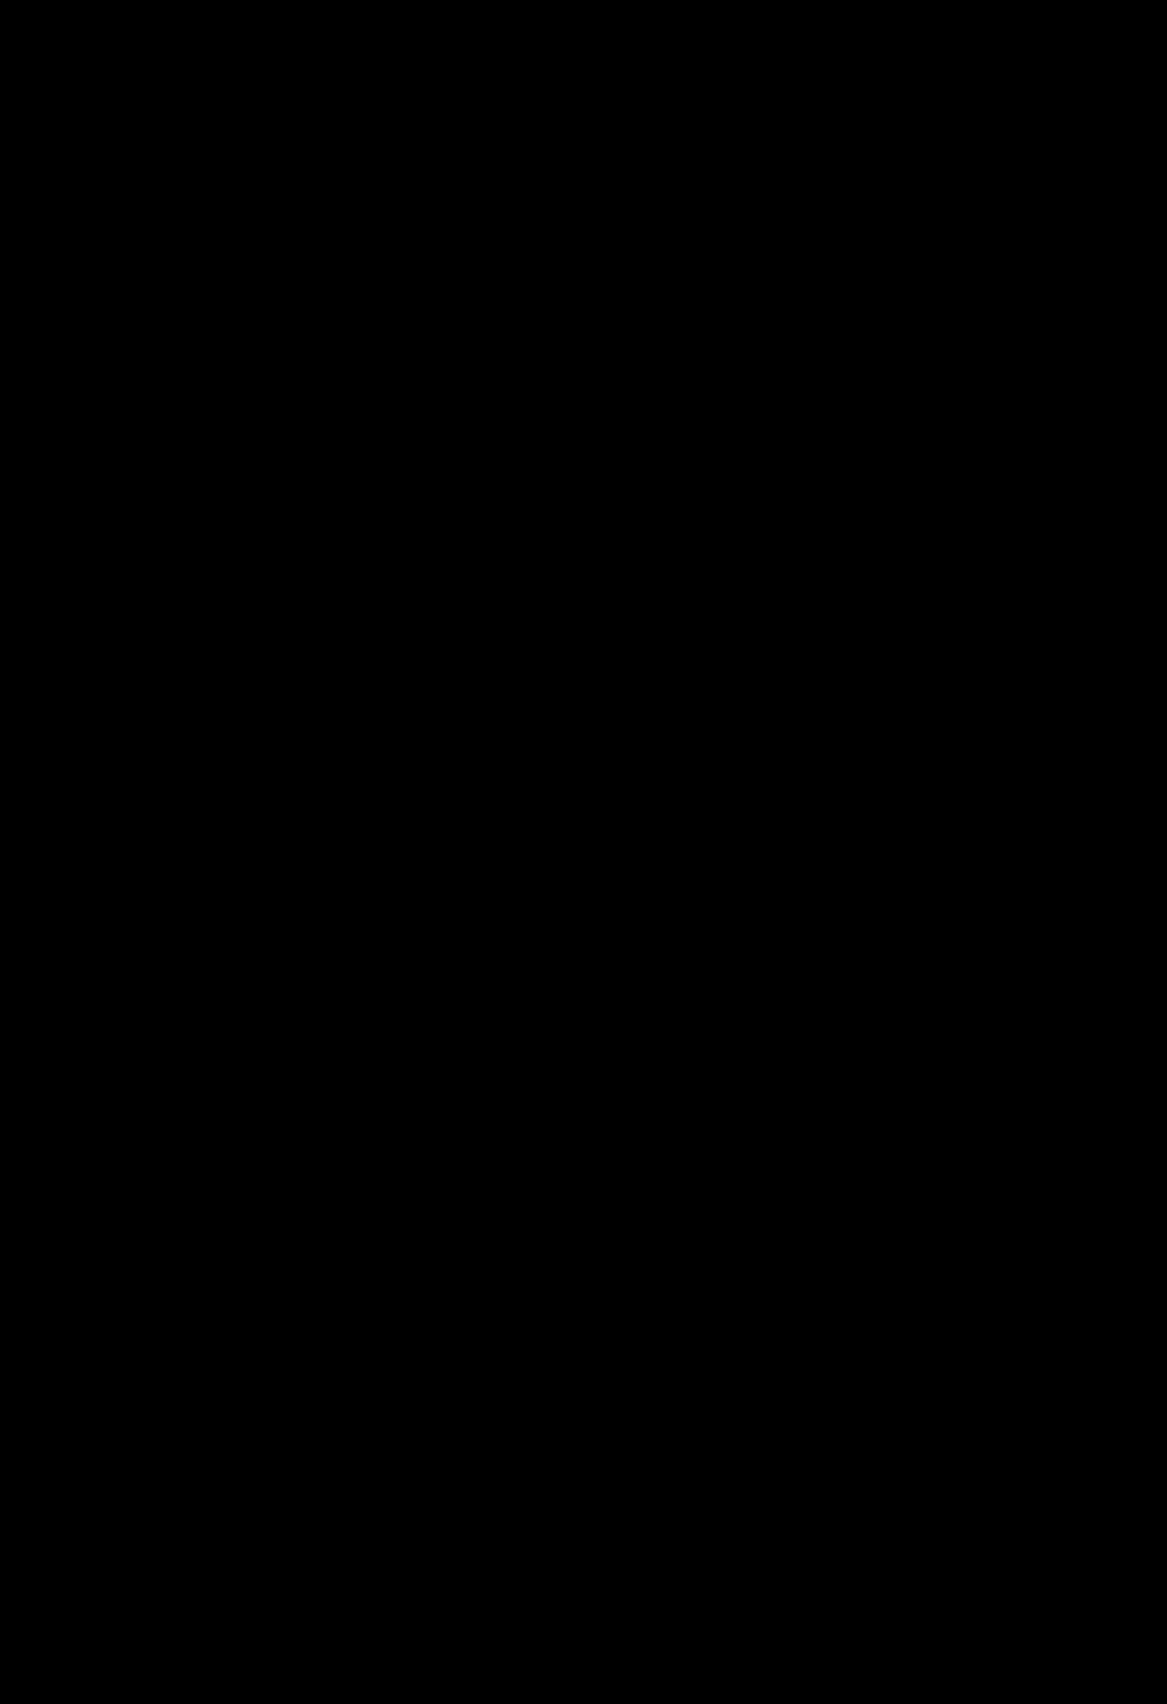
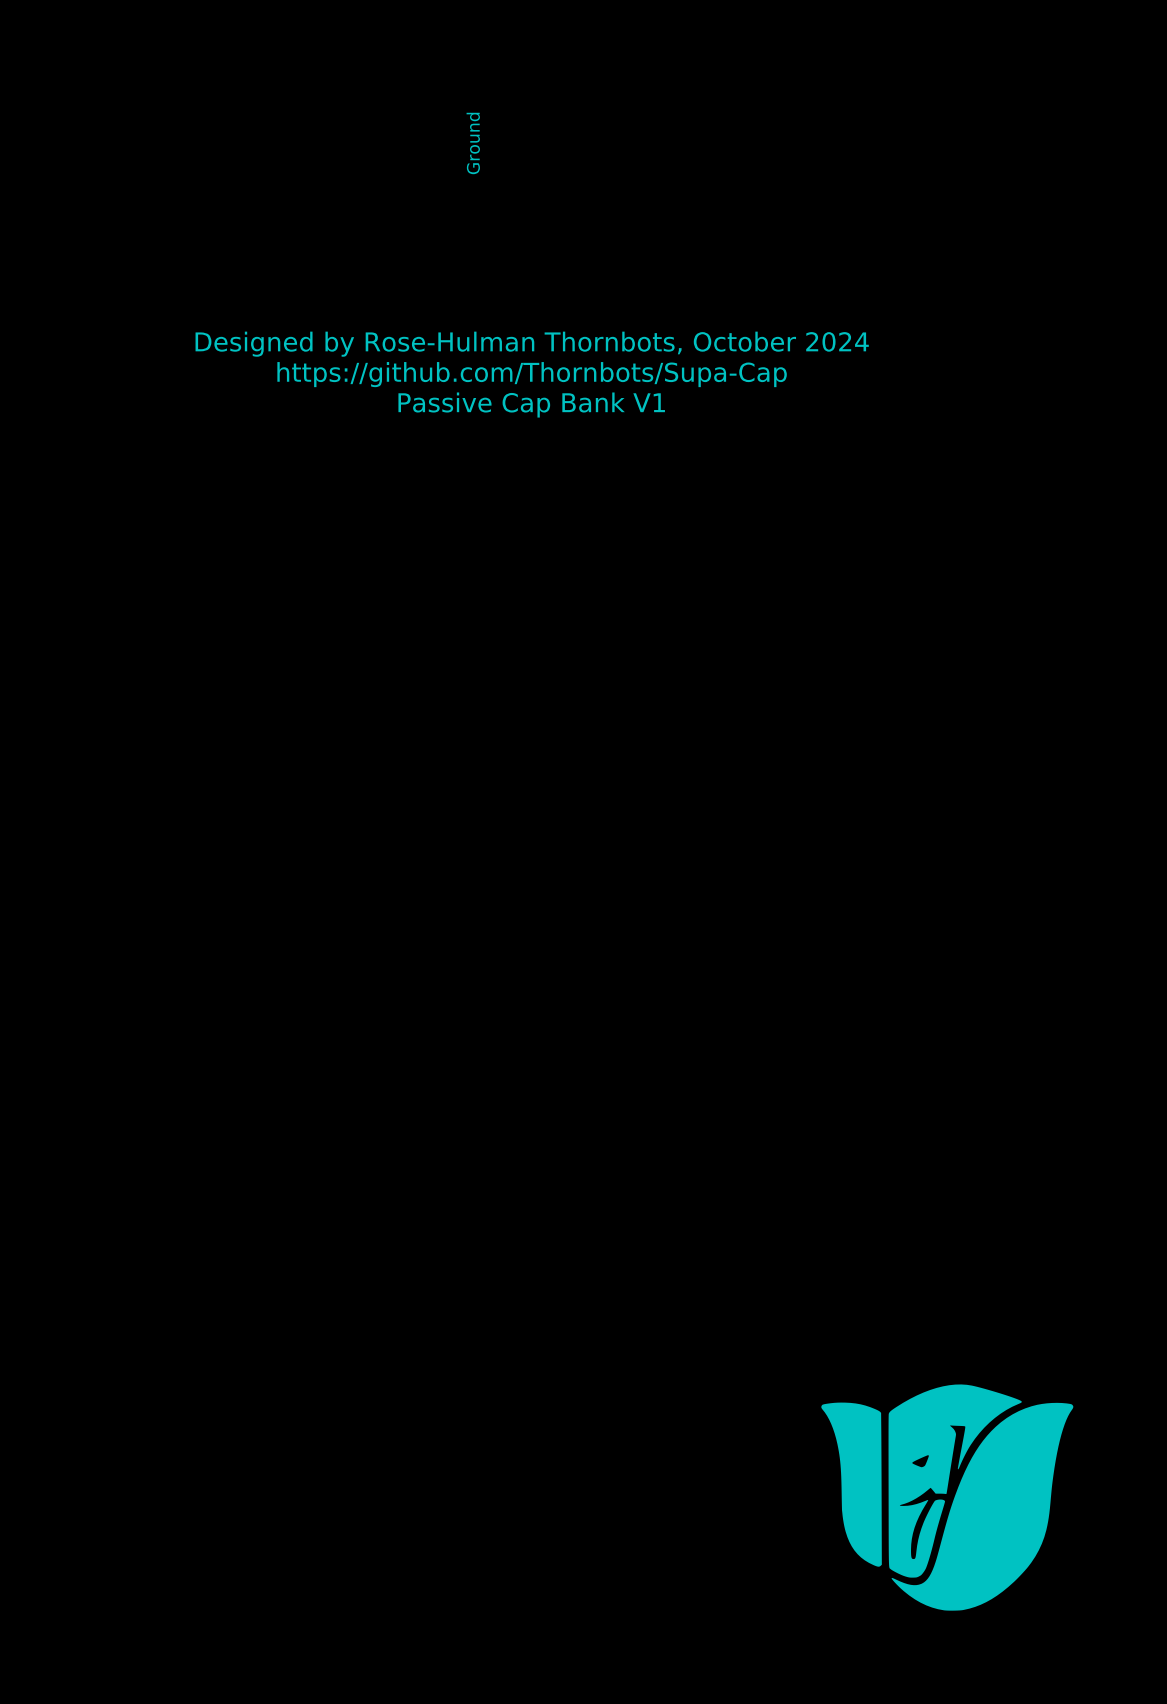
text: none -> Ground (473, 143)
text: none -> Designed by Rose-Hulman Thornbots, October 2024 (532, 344)
text: none -> https://github.com/Thornbots/Supa-Cap (532, 374)
text: none -> Passive Cap Bank V1 (531, 405)
drawing: none -> [821, 1384, 1074, 1611]

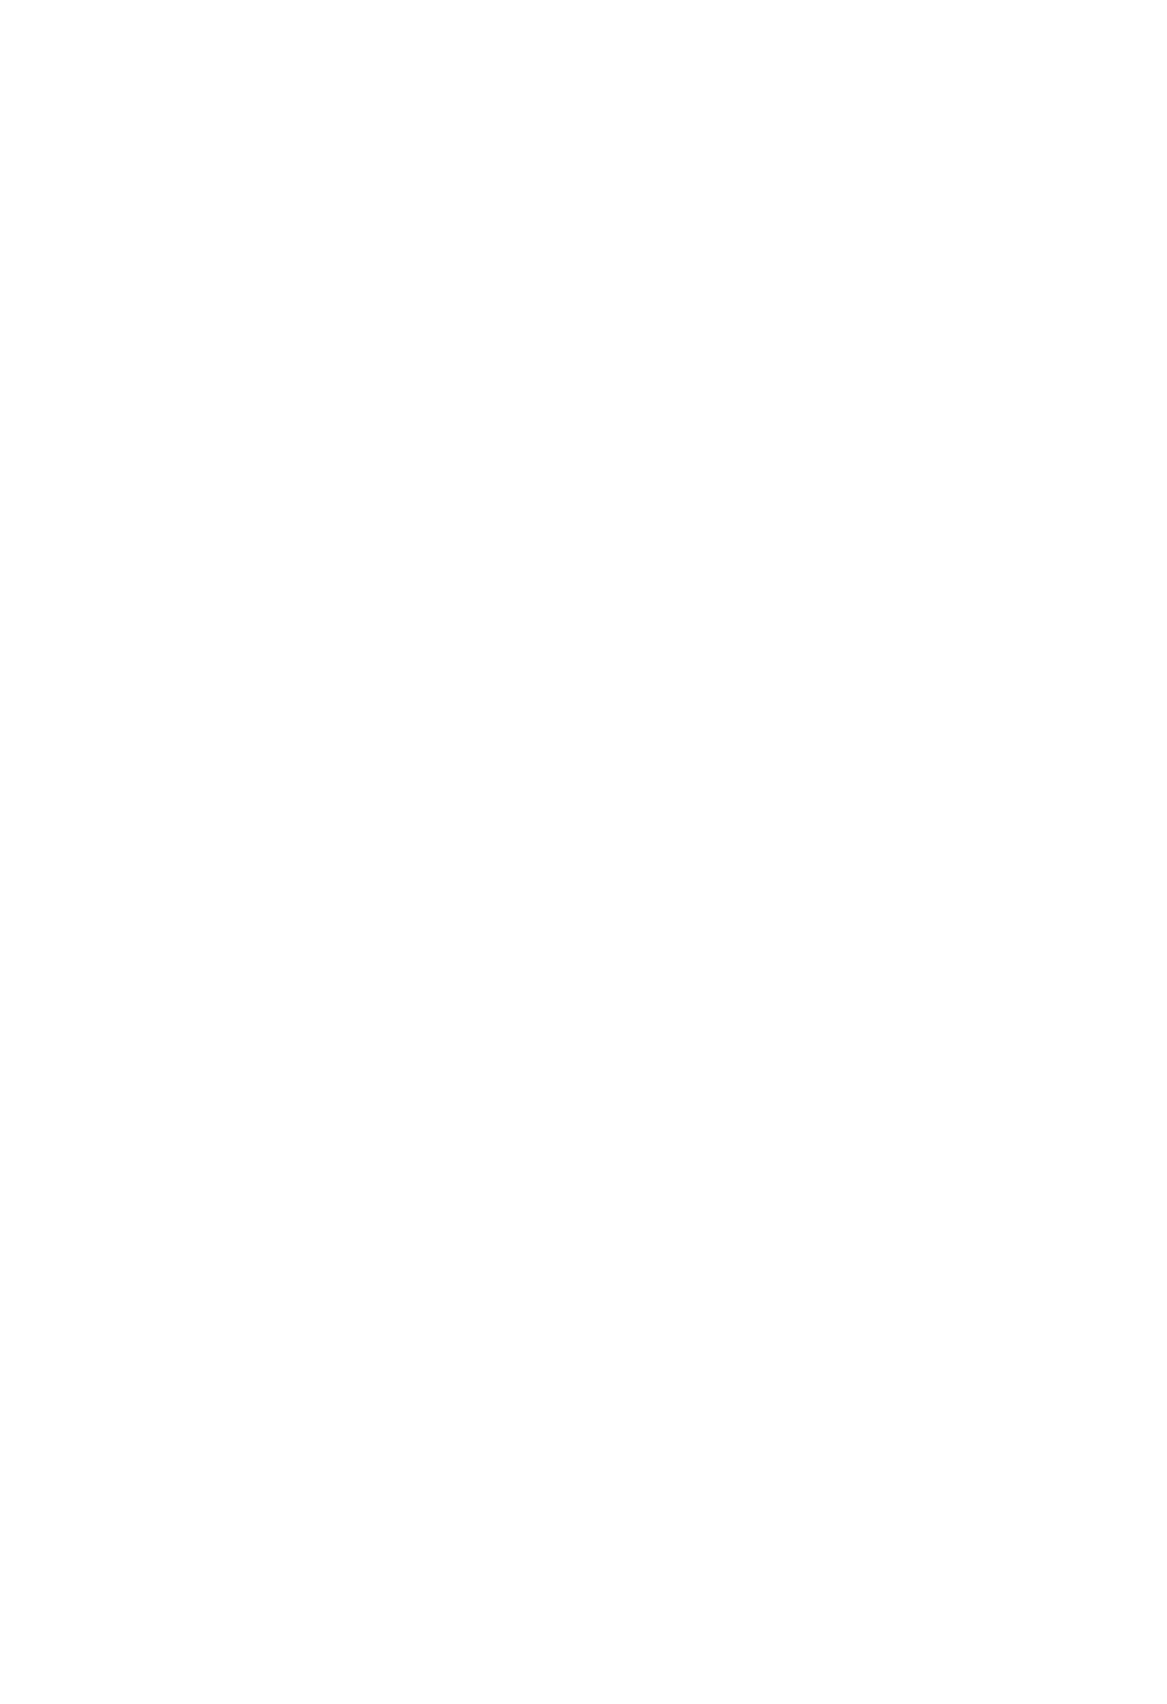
text: Ground (473, 143) -> none
text: Designed by Rose-Hulman Thornbots, October 2024 (532, 344) -> none
text: https://github.com/Thornbots/Supa-Cap (532, 374) -> none
text: Passive Cap Bank V1 (531, 405) -> none
drawing: [821, 1384, 1074, 1611] -> none

